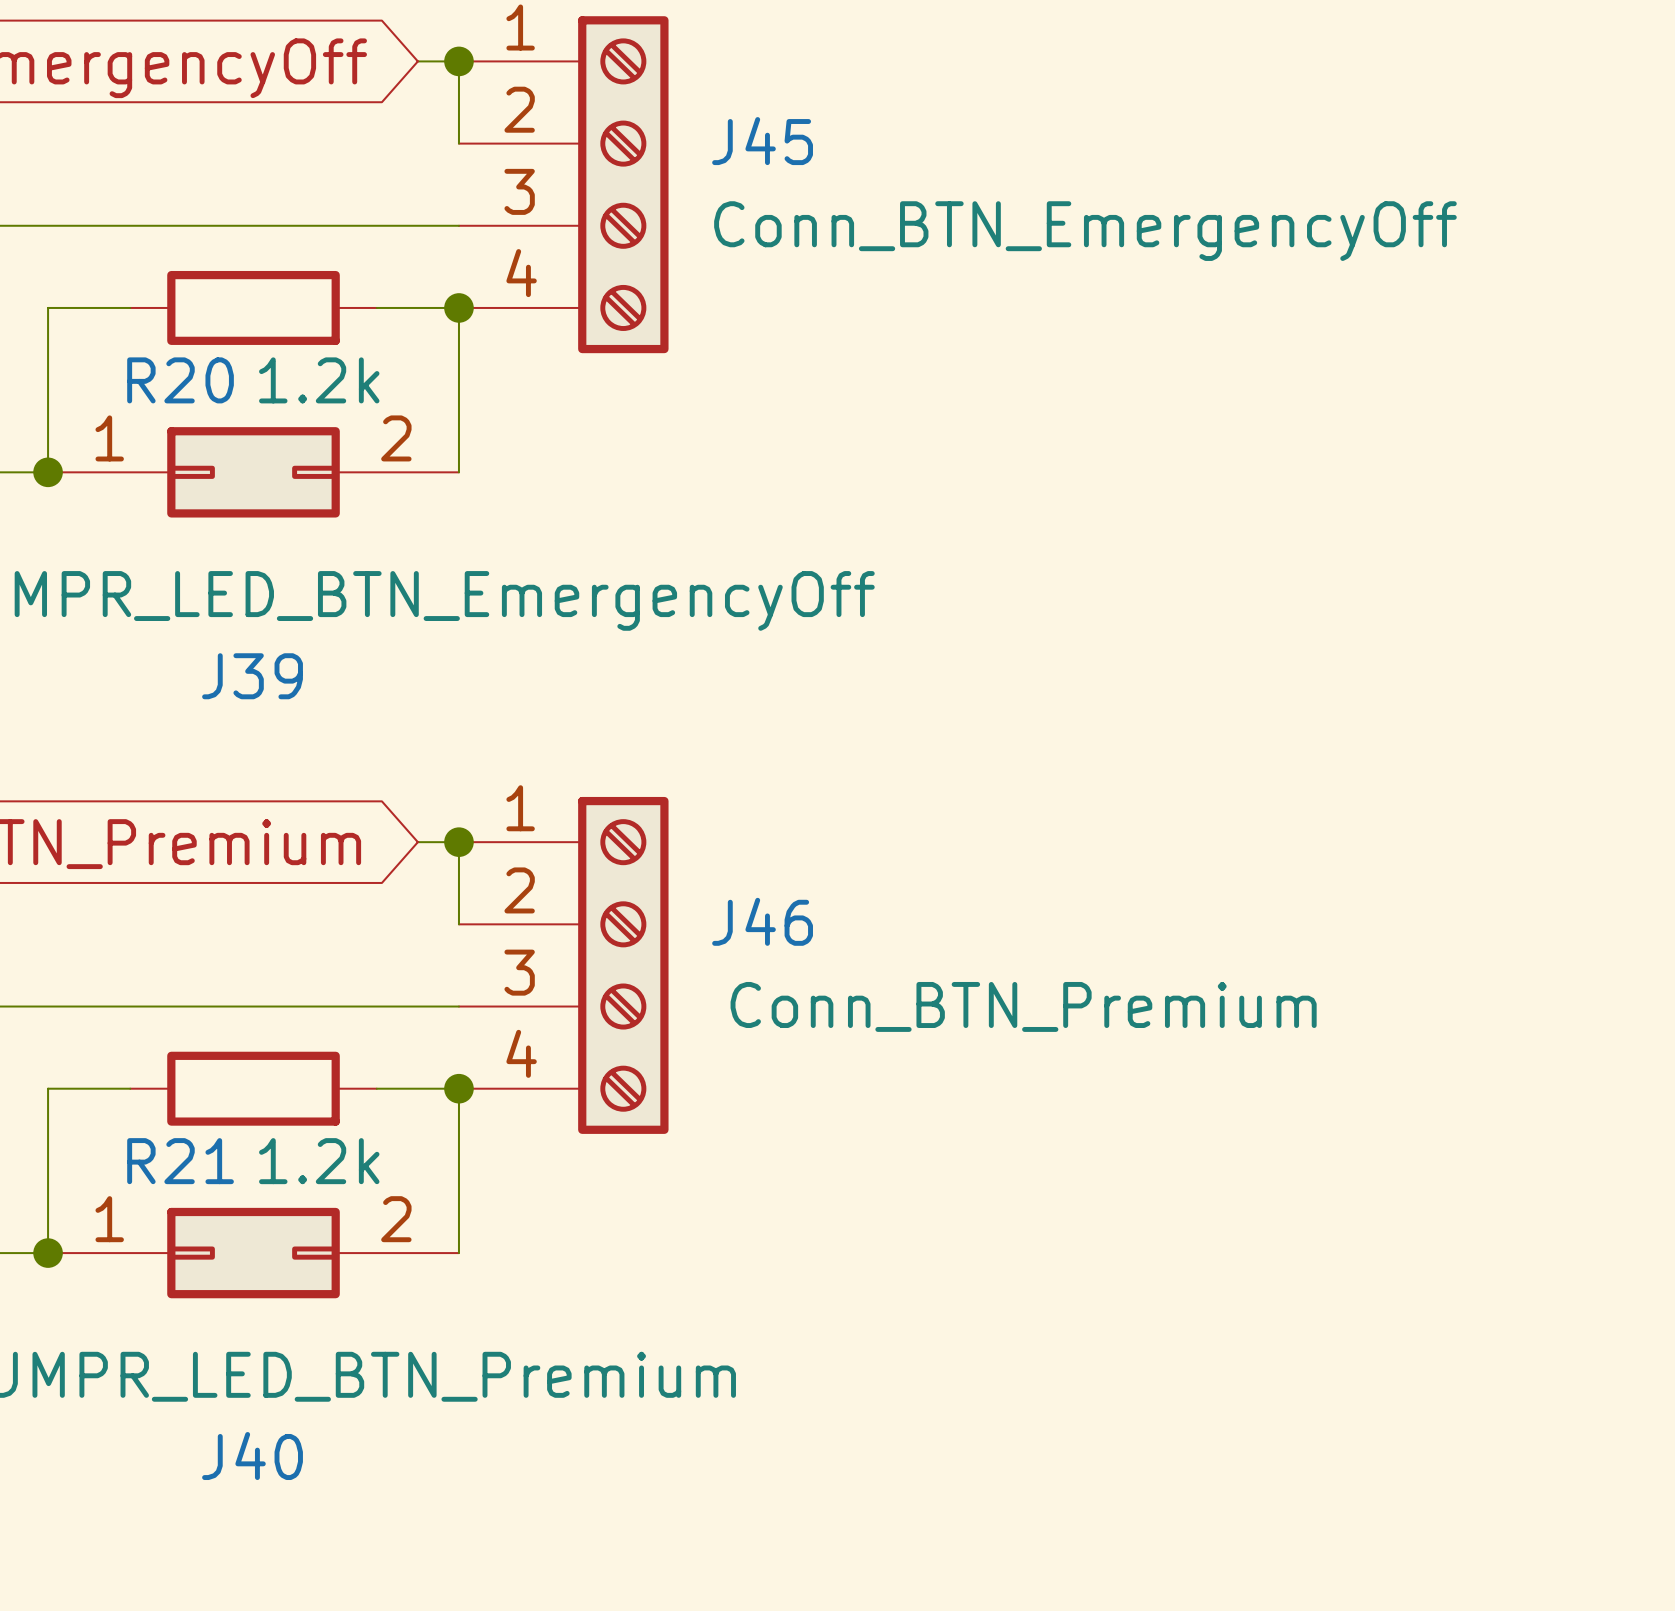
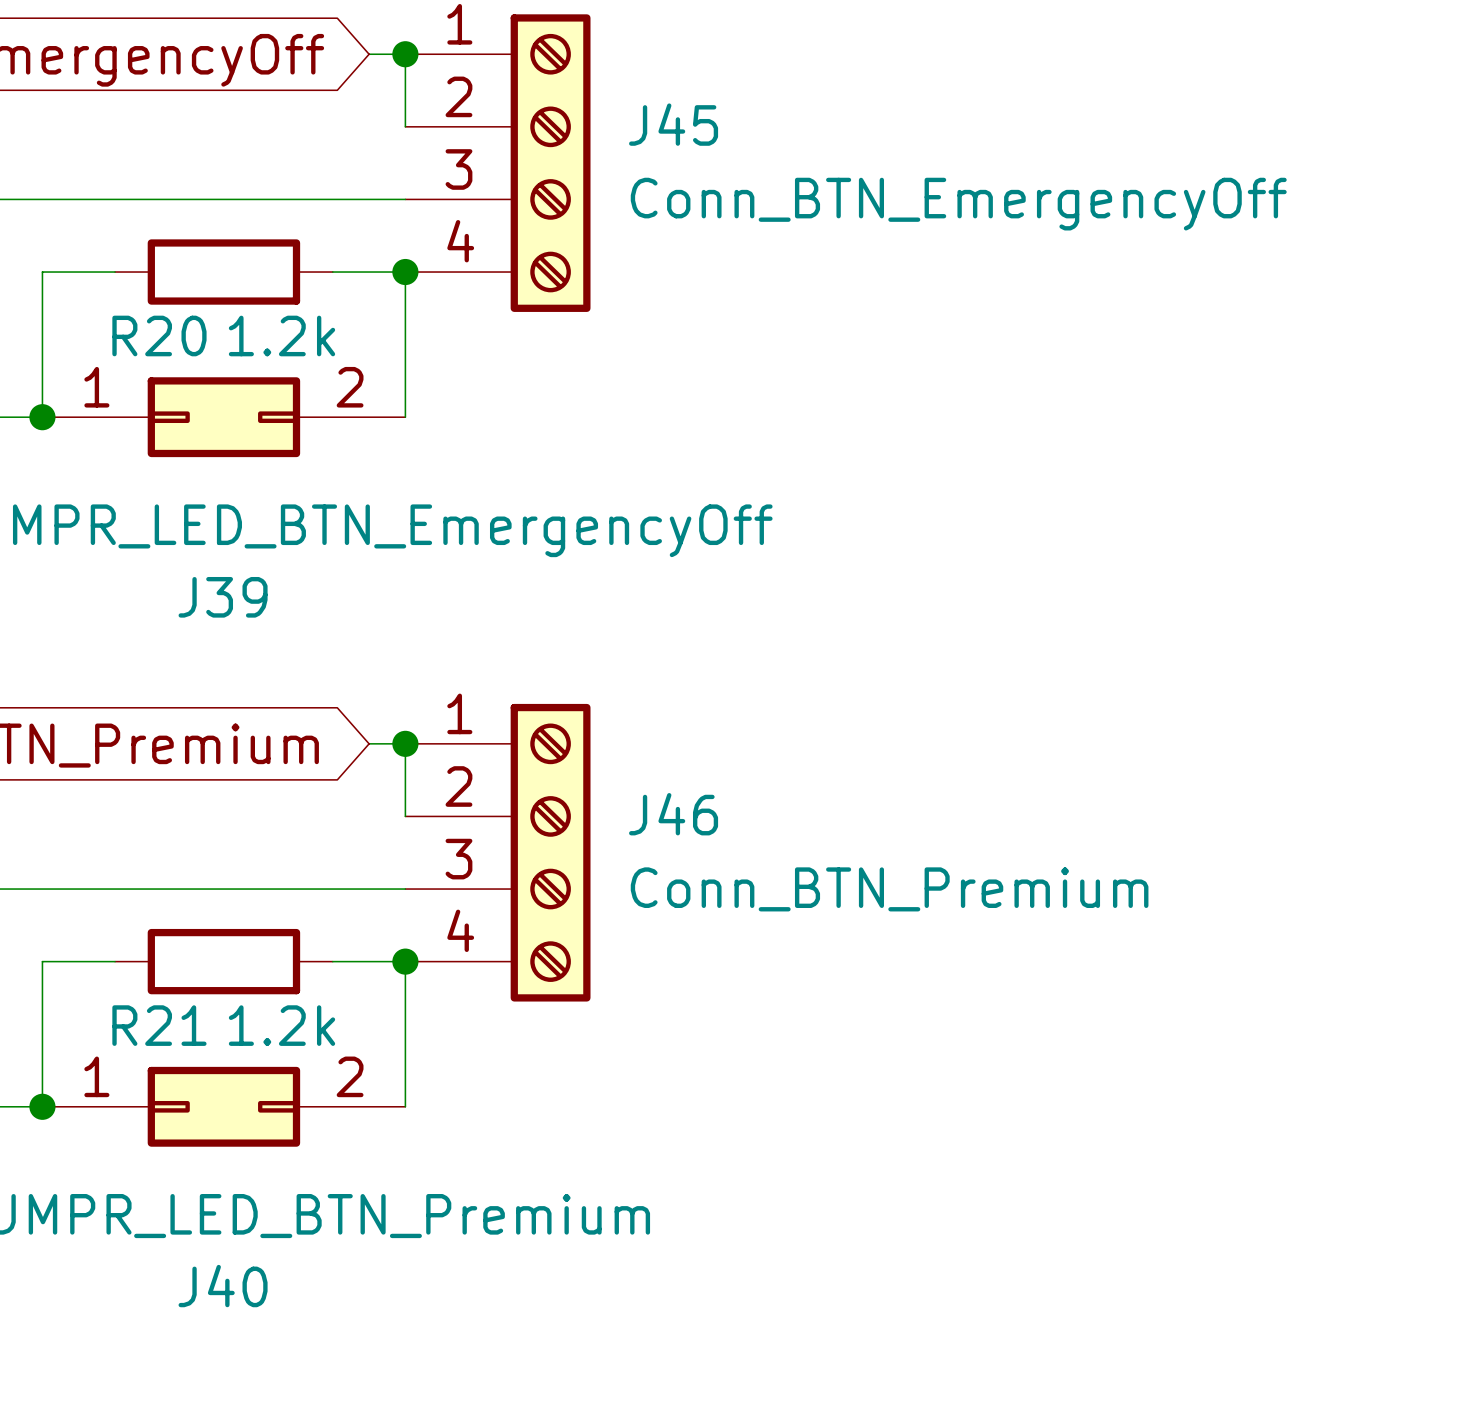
J46 value position: Conn_BTN_Premium (1023, 1006) -> Conn_BTN_Premium (889, 889)

